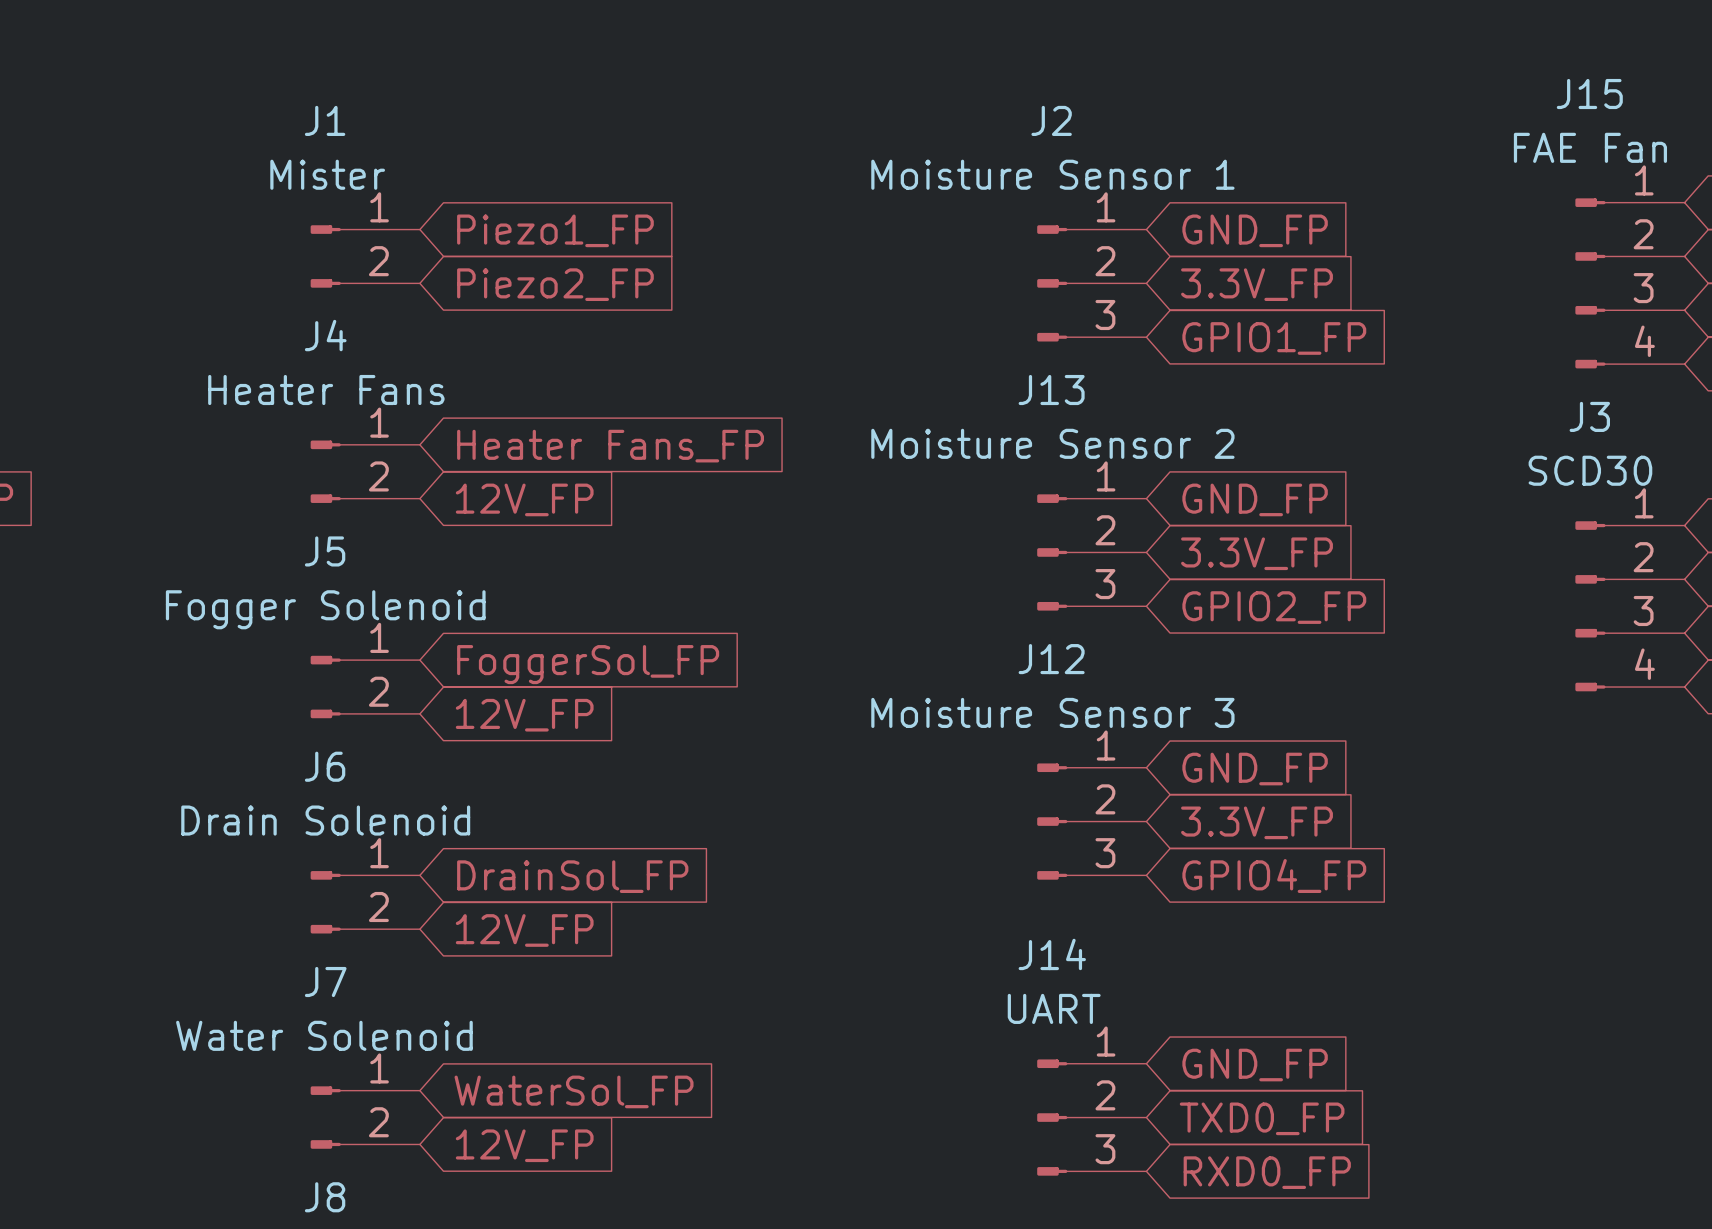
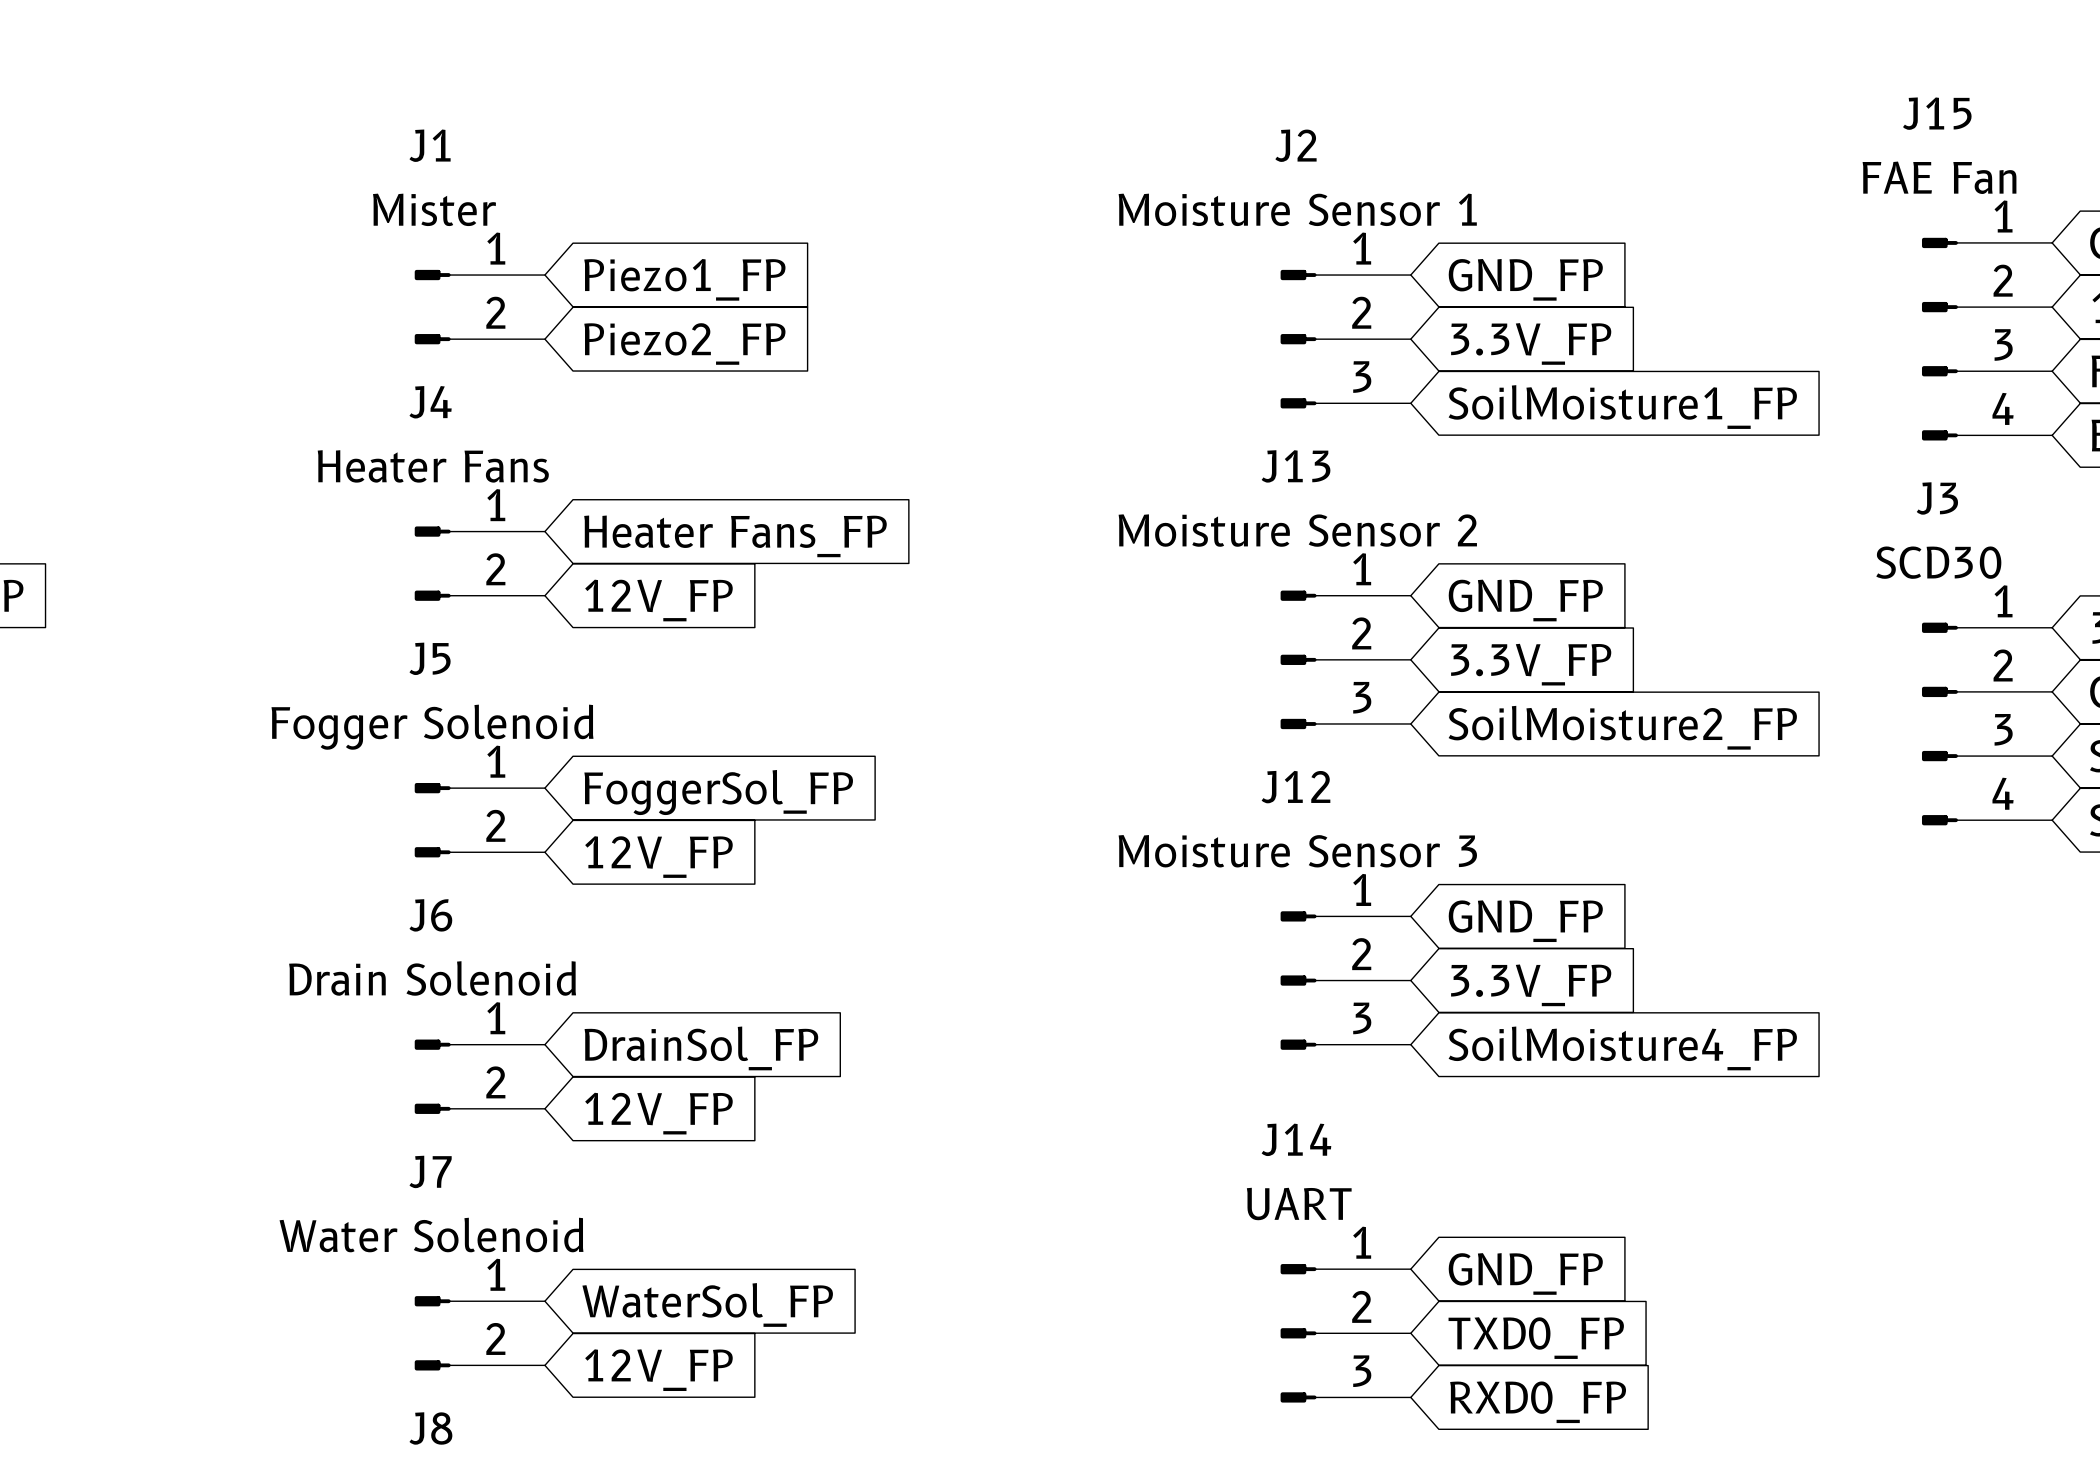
global label: GPIO1_FP (1274, 338) -> SoilMoisture1_FP (1622, 407)
global label: GPIO2_FP (1274, 607) -> SoilMoisture2_FP (1622, 727)
global label: GPIO4_FP (1274, 876) -> SoilMoisture4_FP (1622, 1048)

